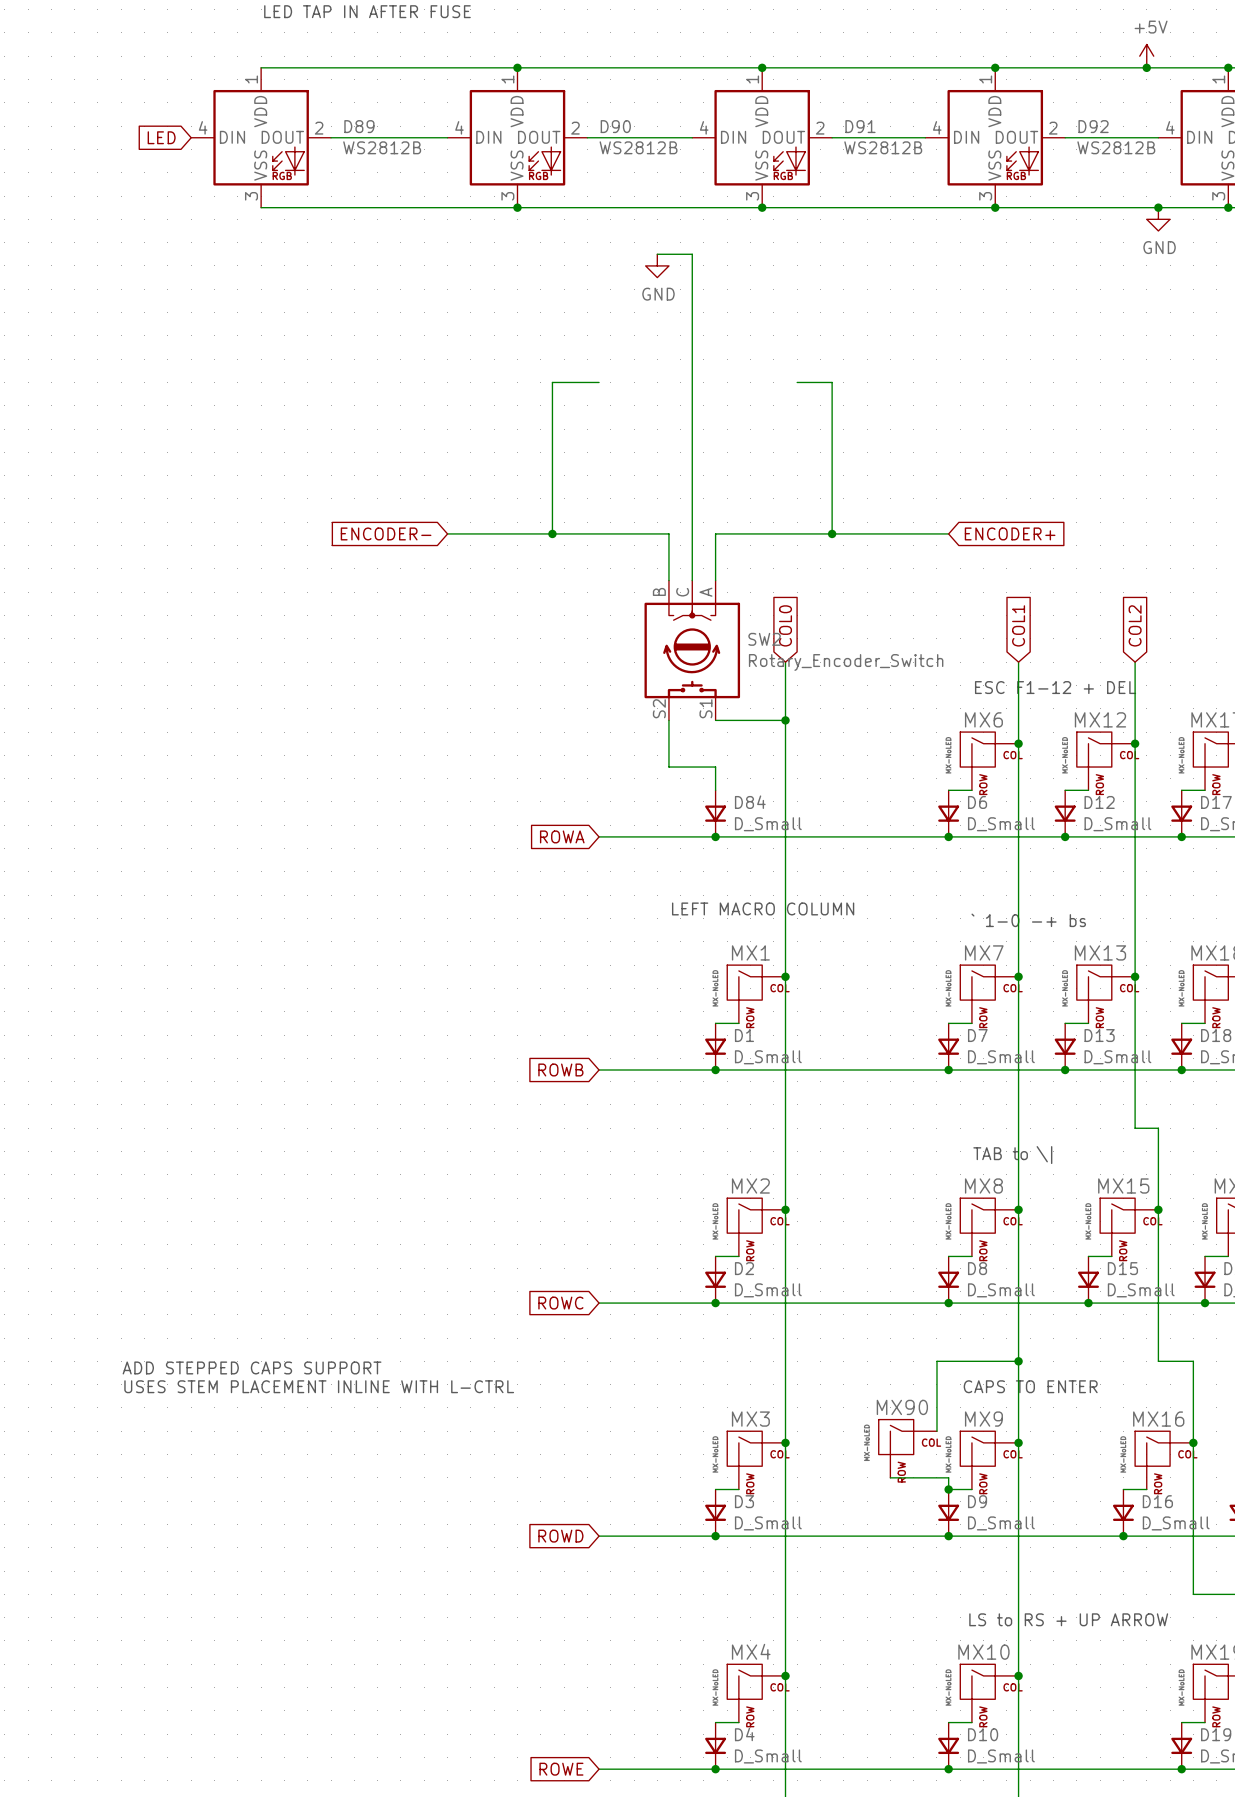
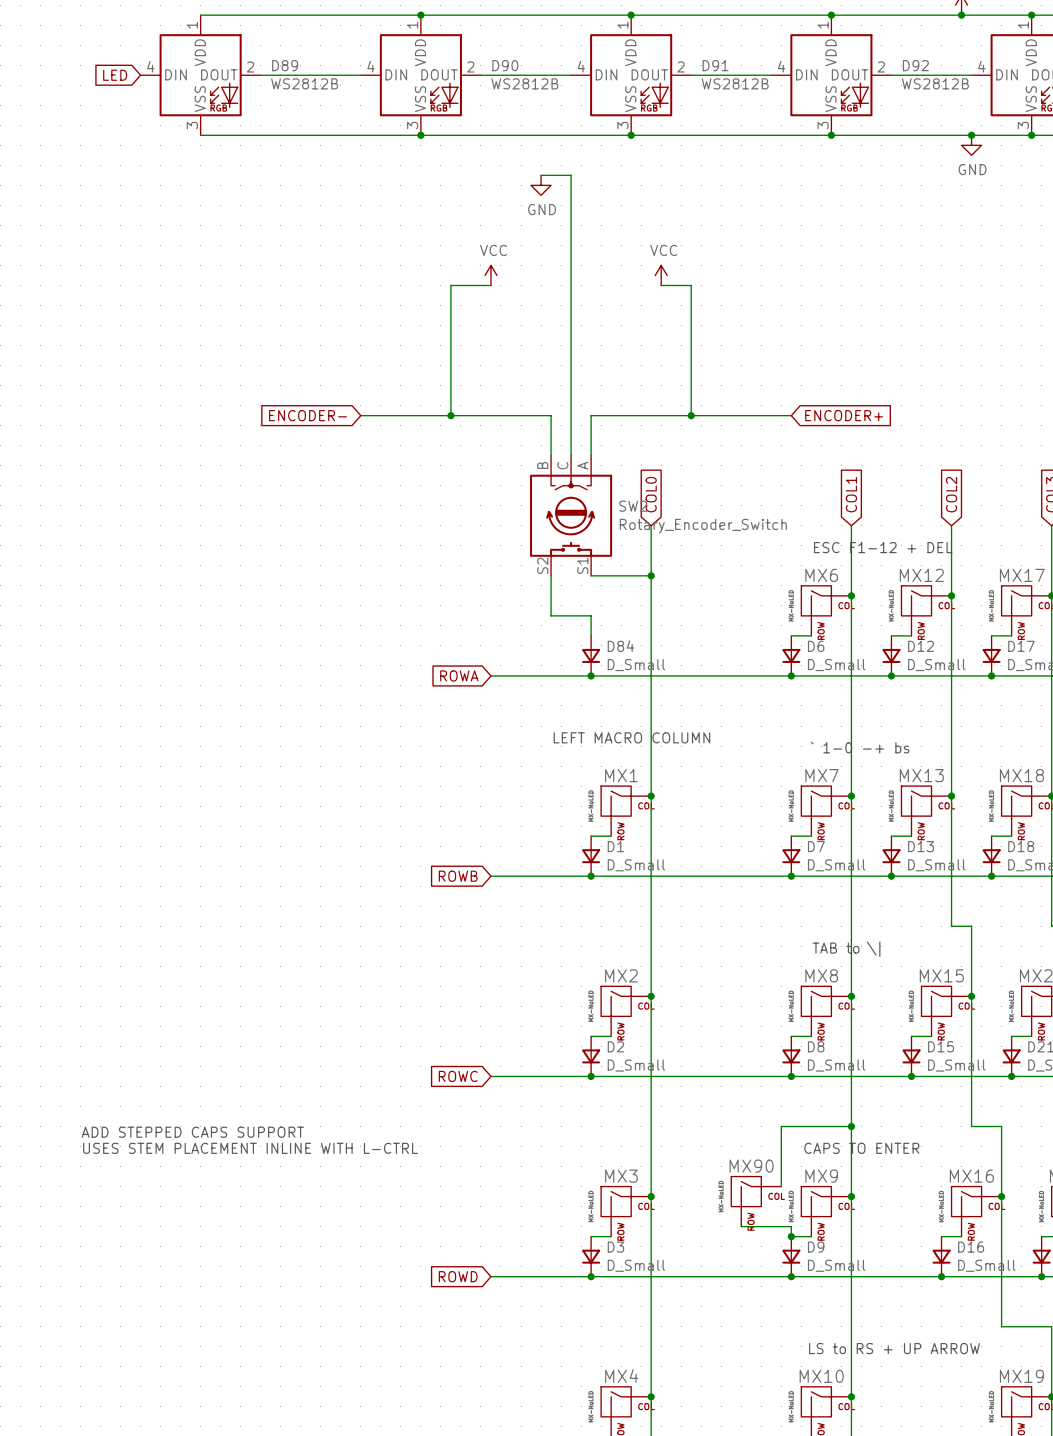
power symbol: none -> VCC (490, 275)
power symbol: none -> VCC (661, 275)

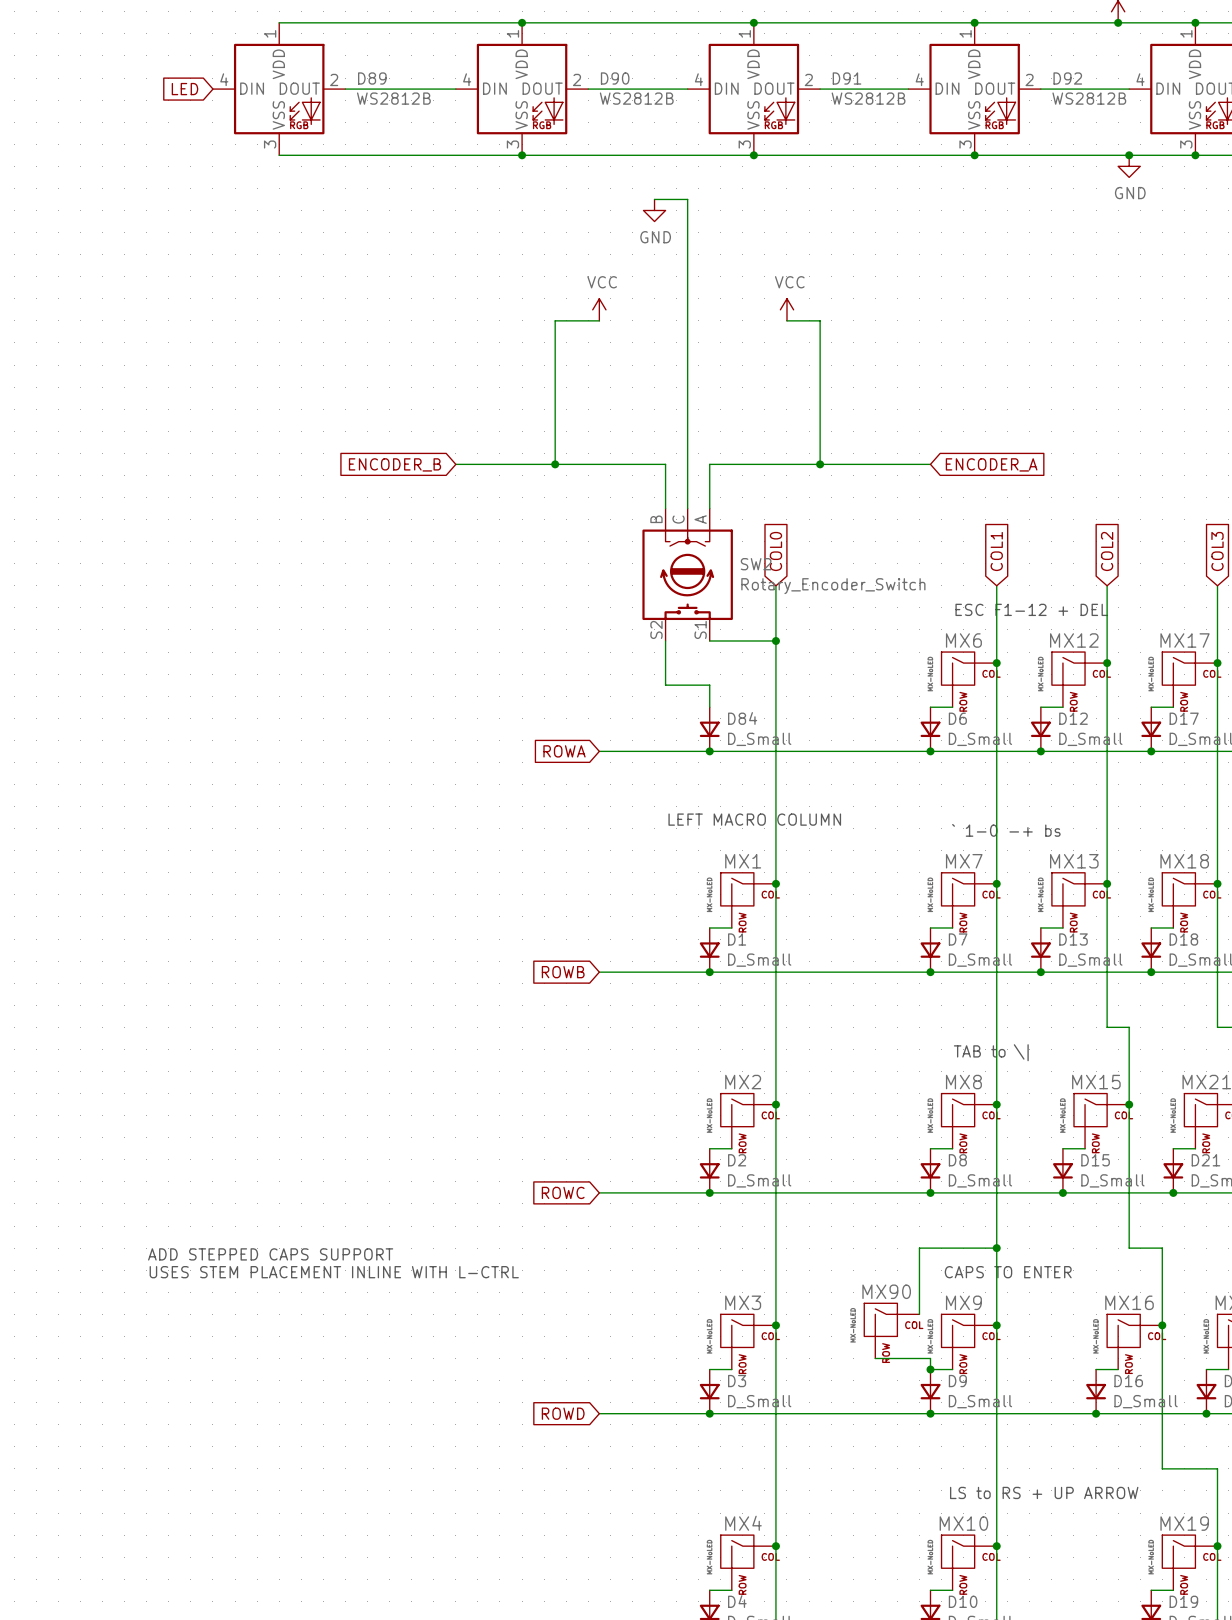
global label: ENCODER- (308, 415) -> ENCODER_B (394, 464)
global label: ENCODER+ (844, 415) -> ENCODER_A (991, 464)

